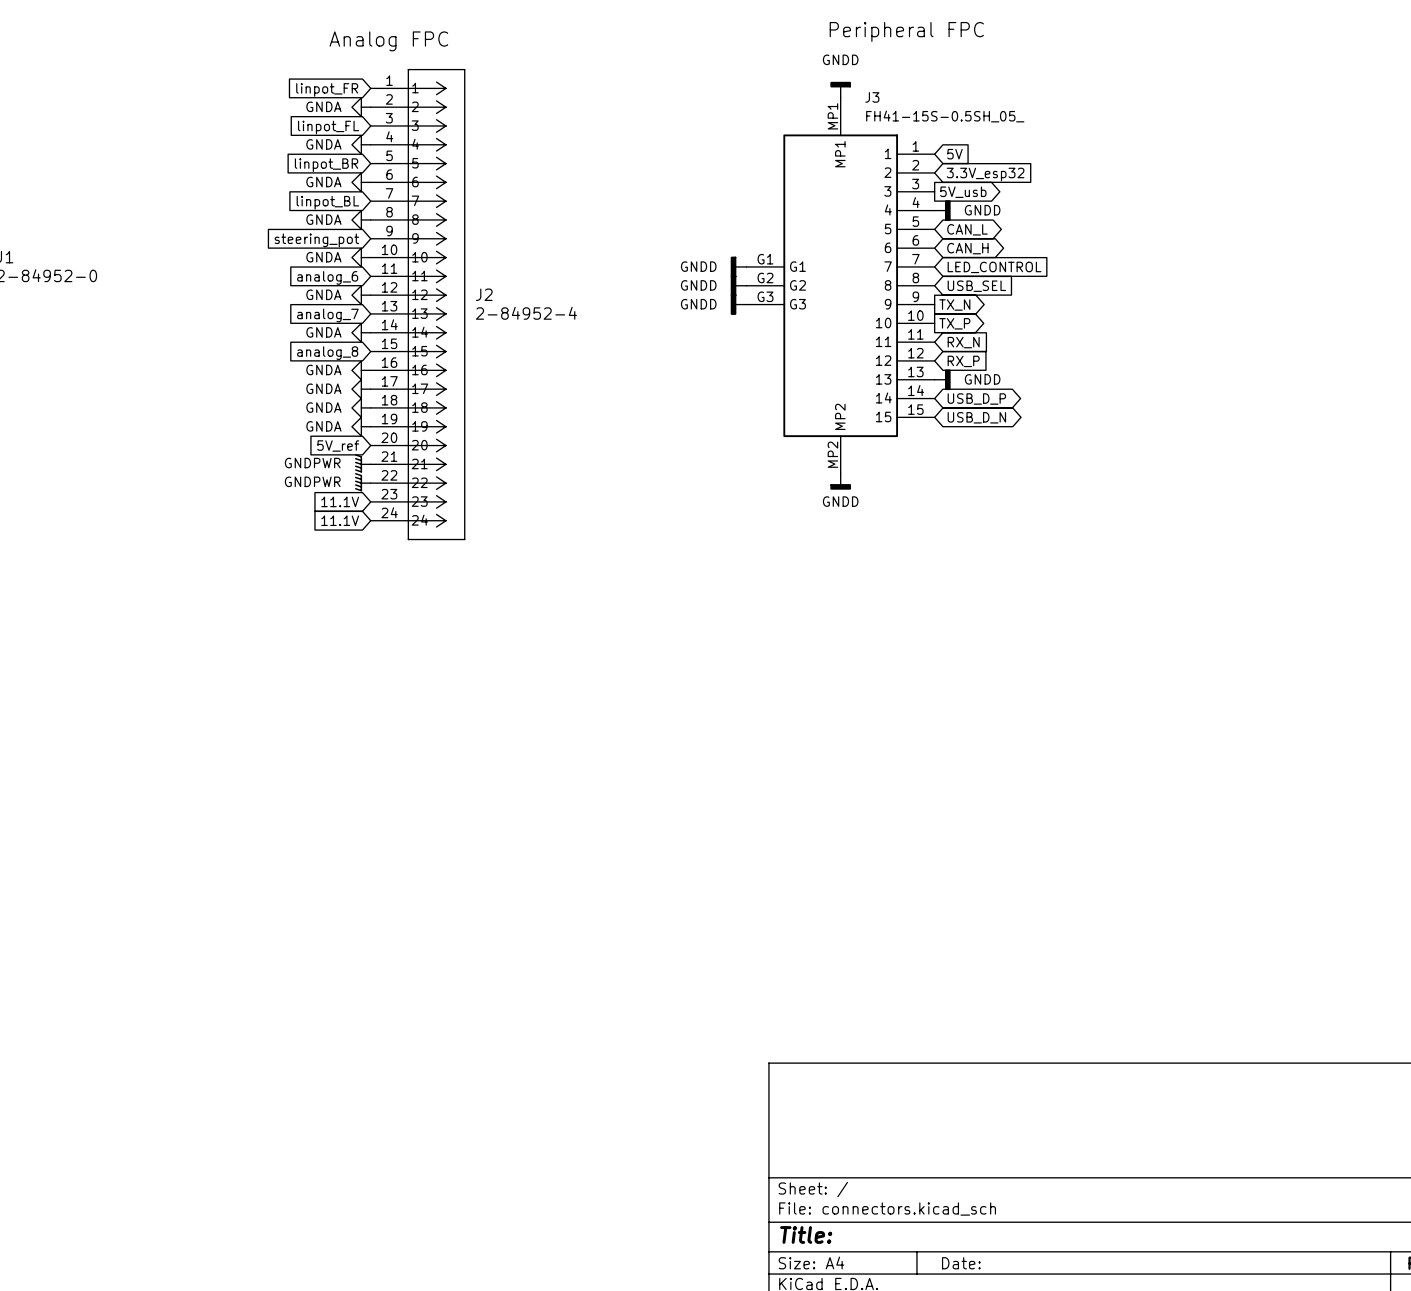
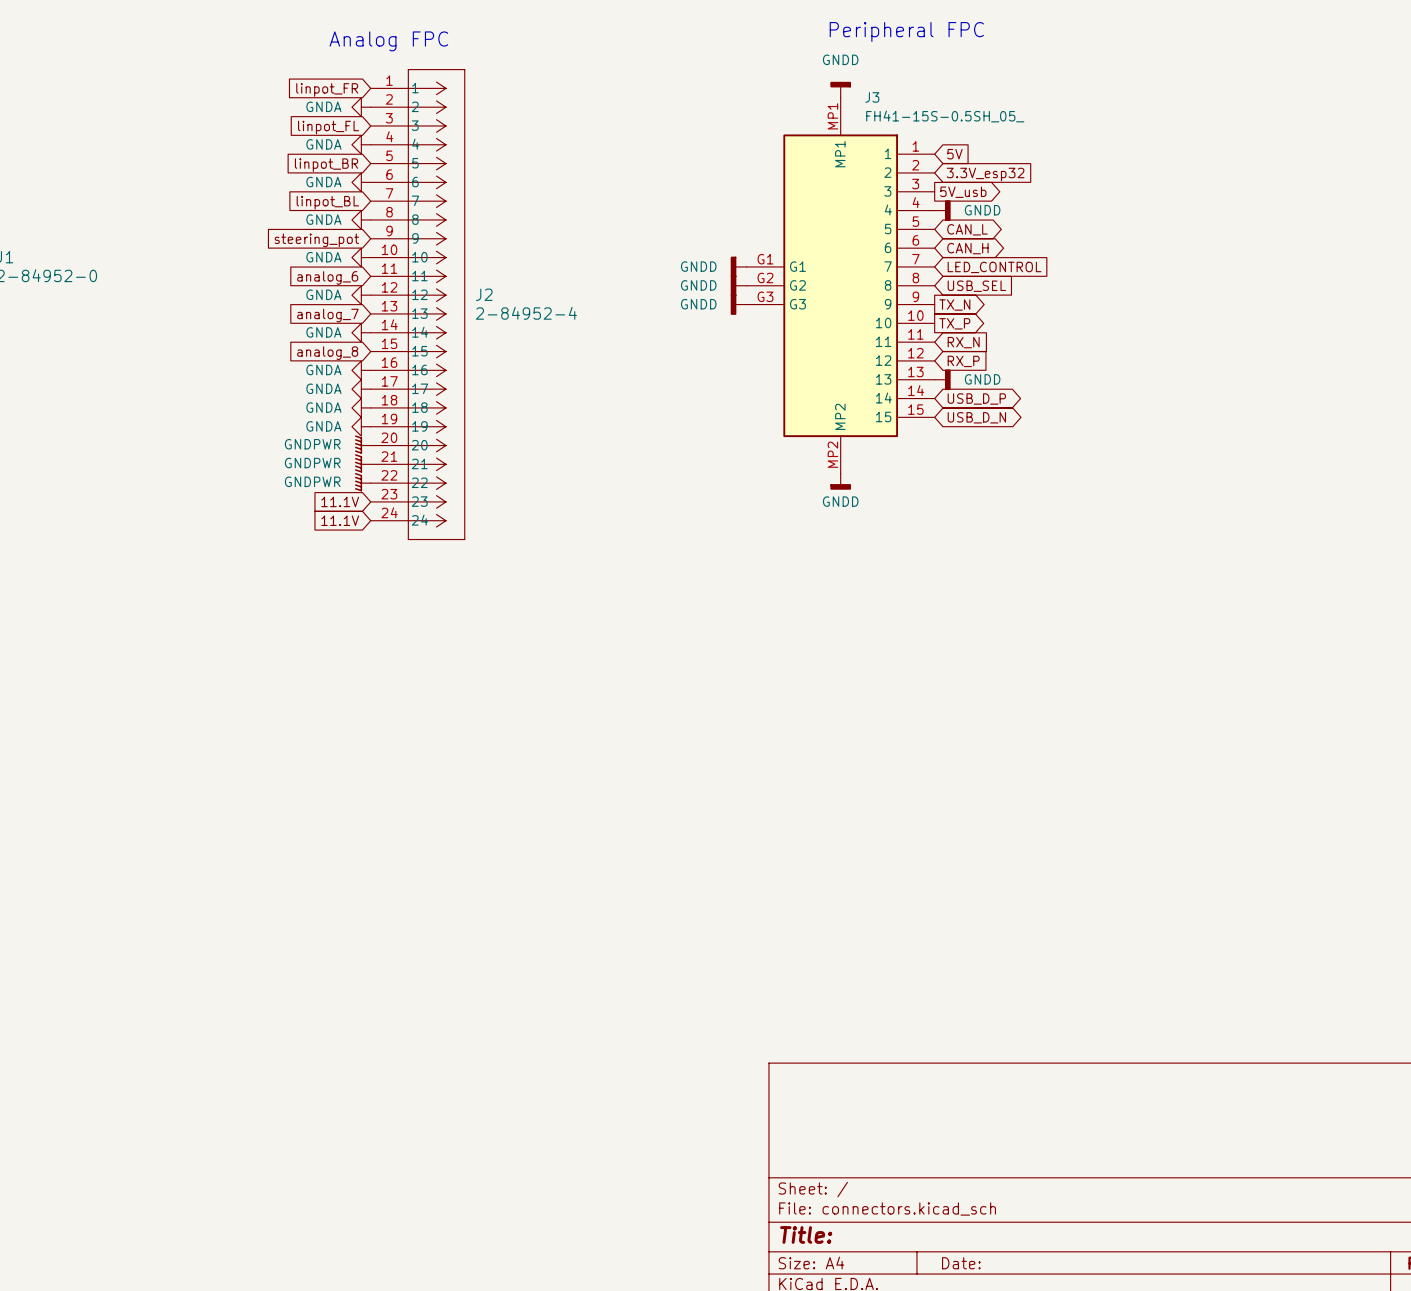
power symbol: none -> GNDPWR (362, 444)
global label: 5V_ref (338, 445) -> none

